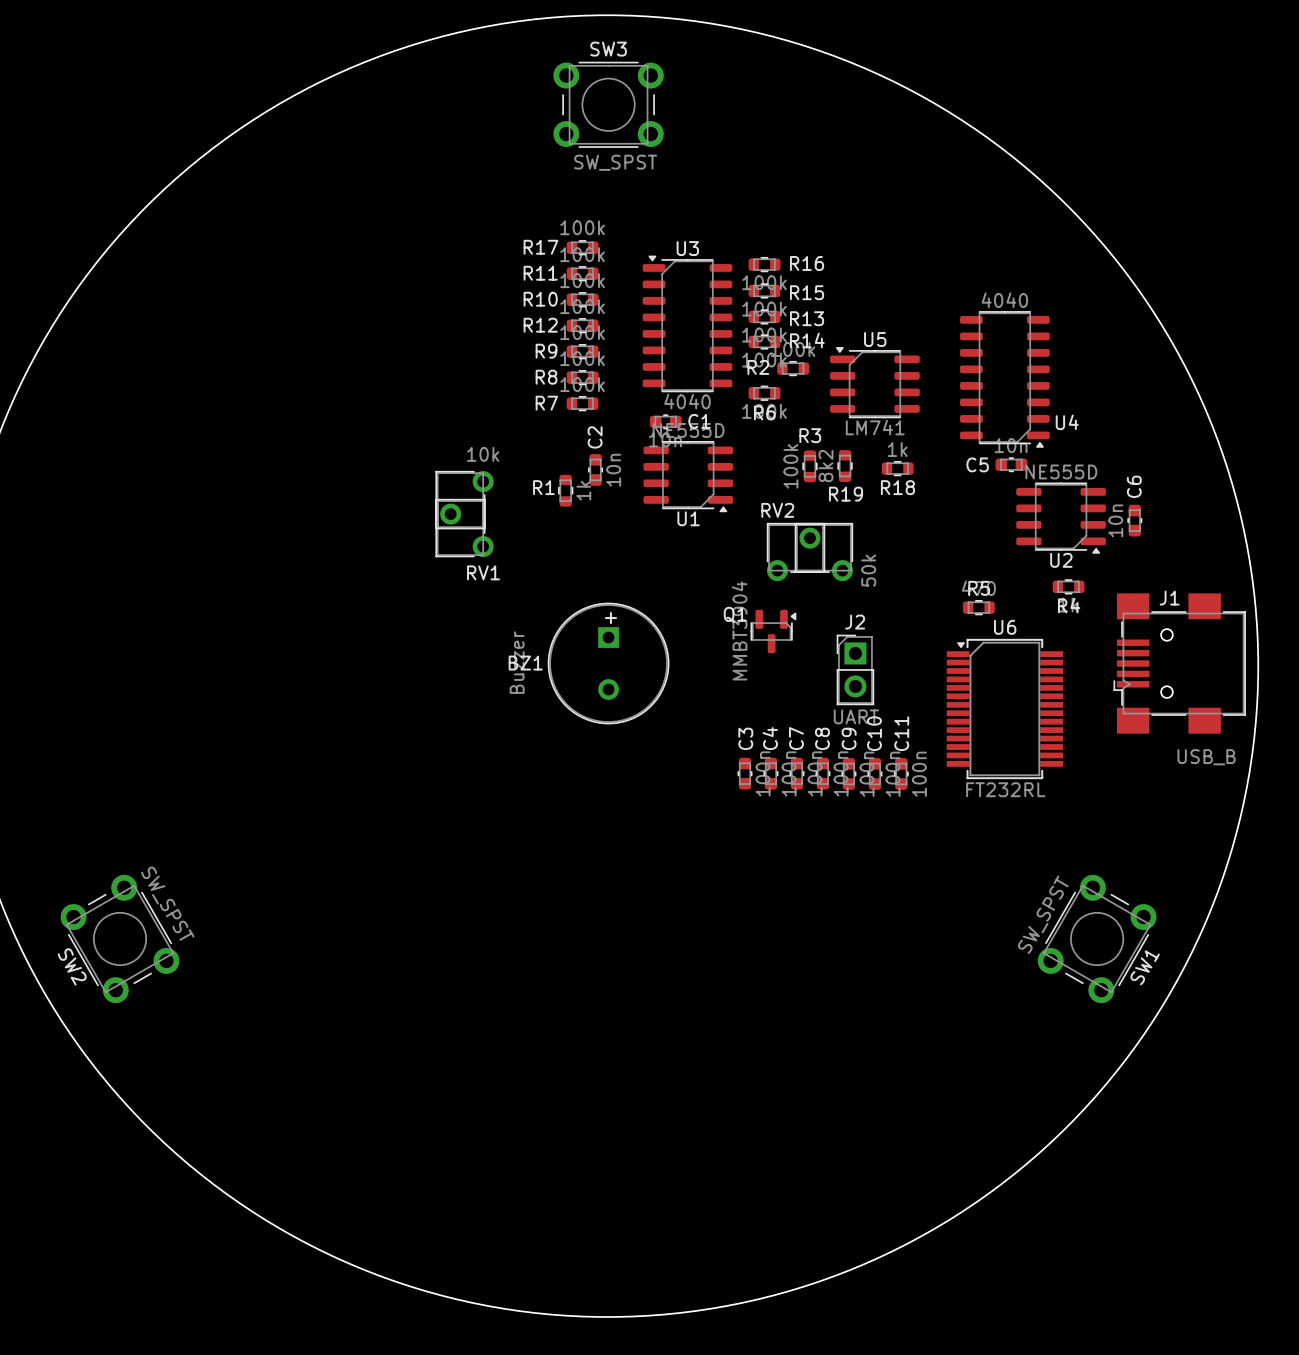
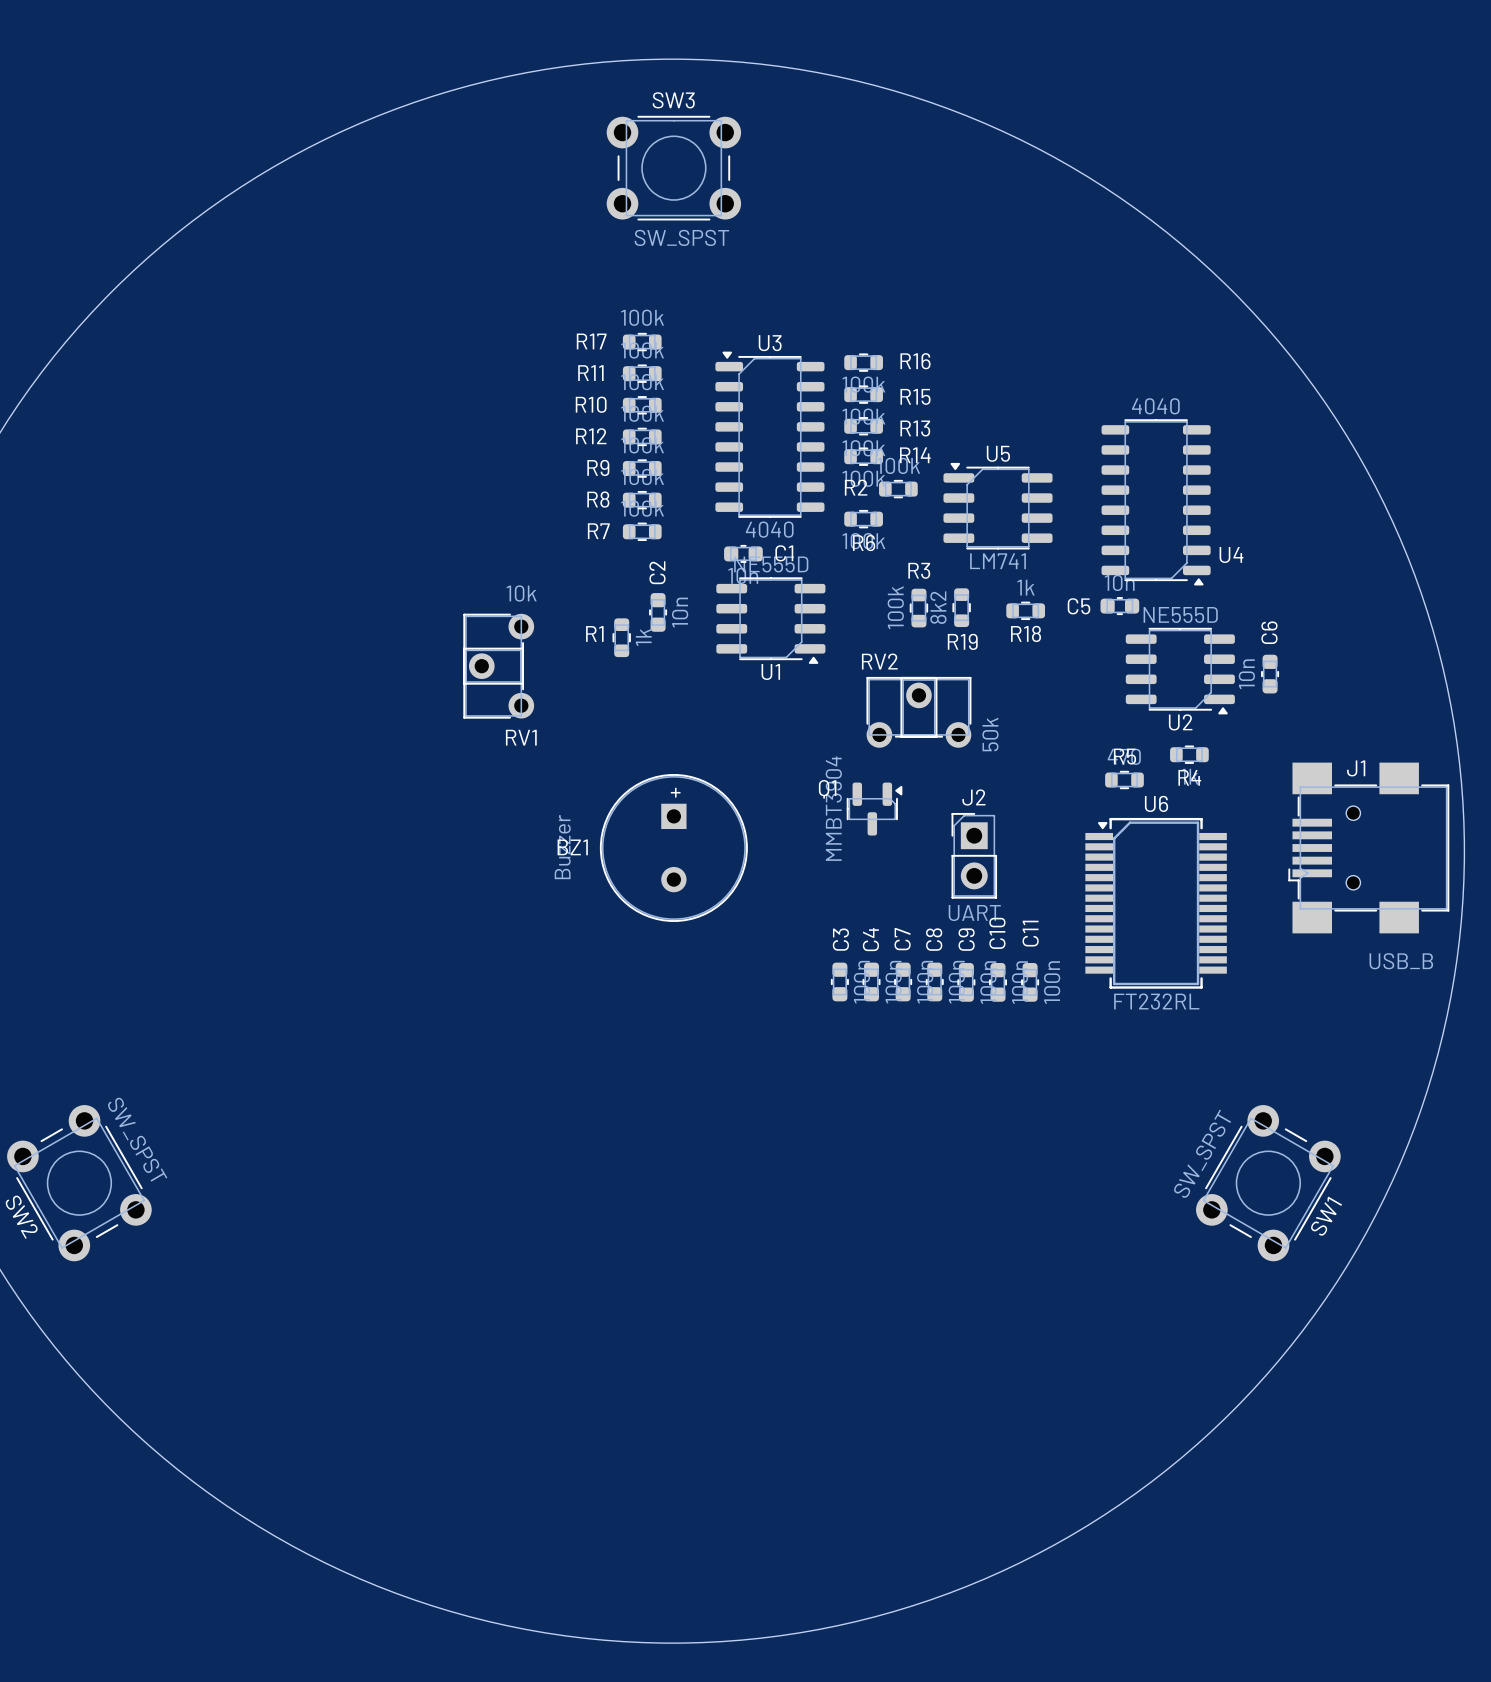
C5 position: (1011, 464) -> (1119, 606)
U2 position: (1061, 518) -> (1180, 671)
C6 position: (1134, 520) -> (1270, 674)
R4 position: (1068, 586) -> (1189, 754)

